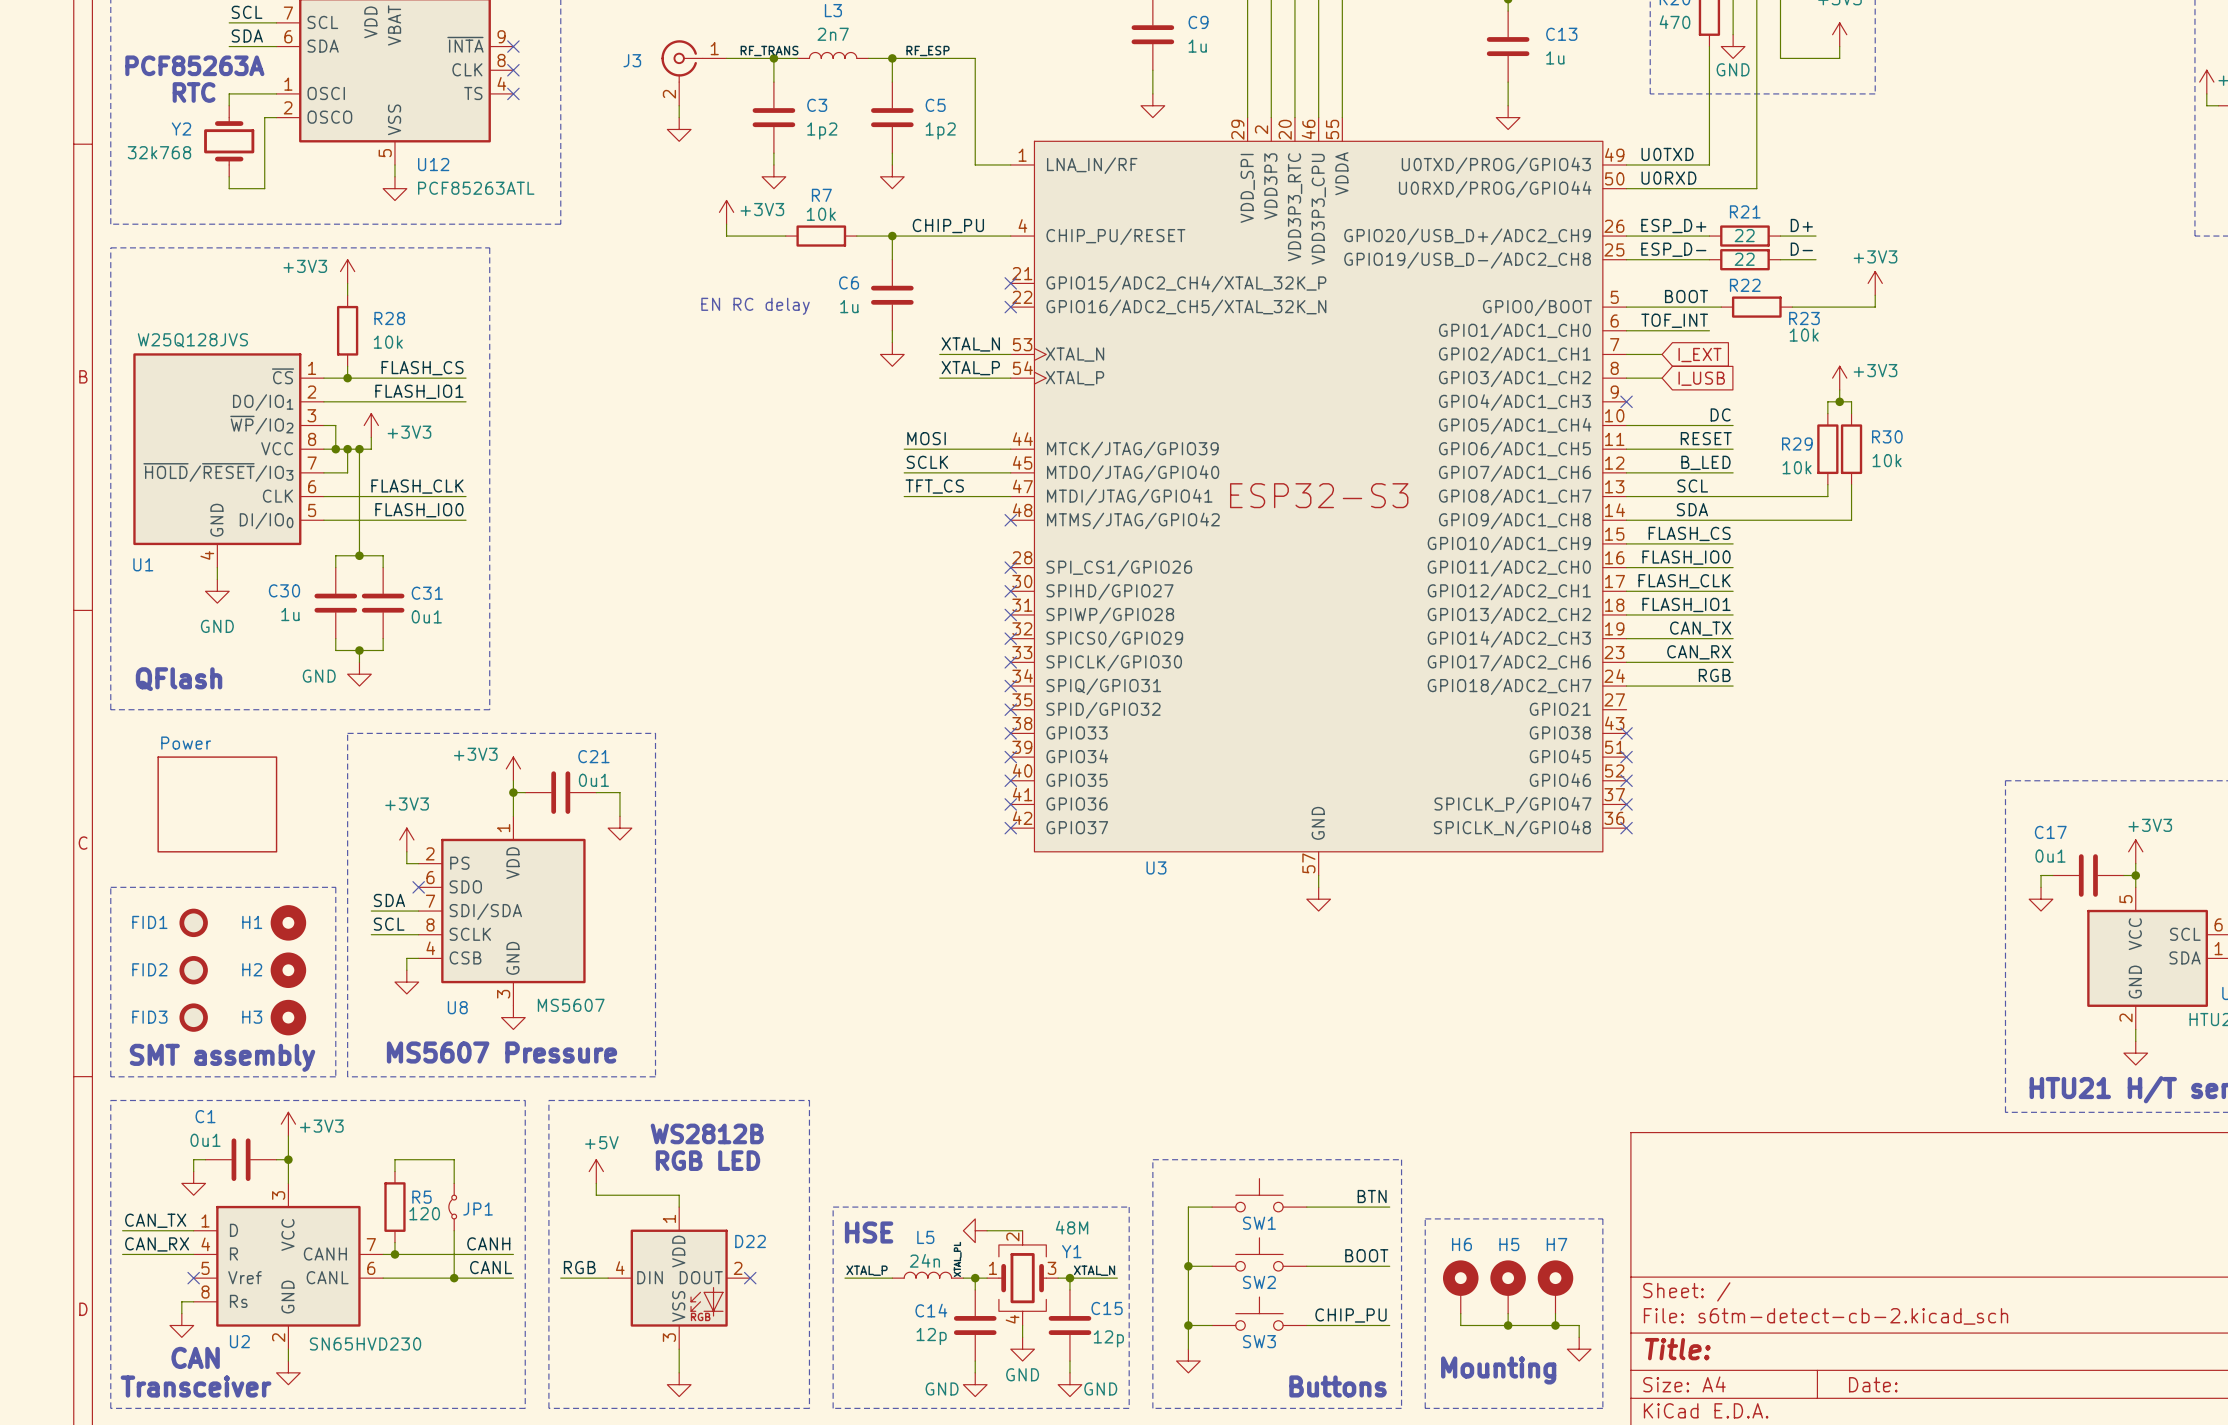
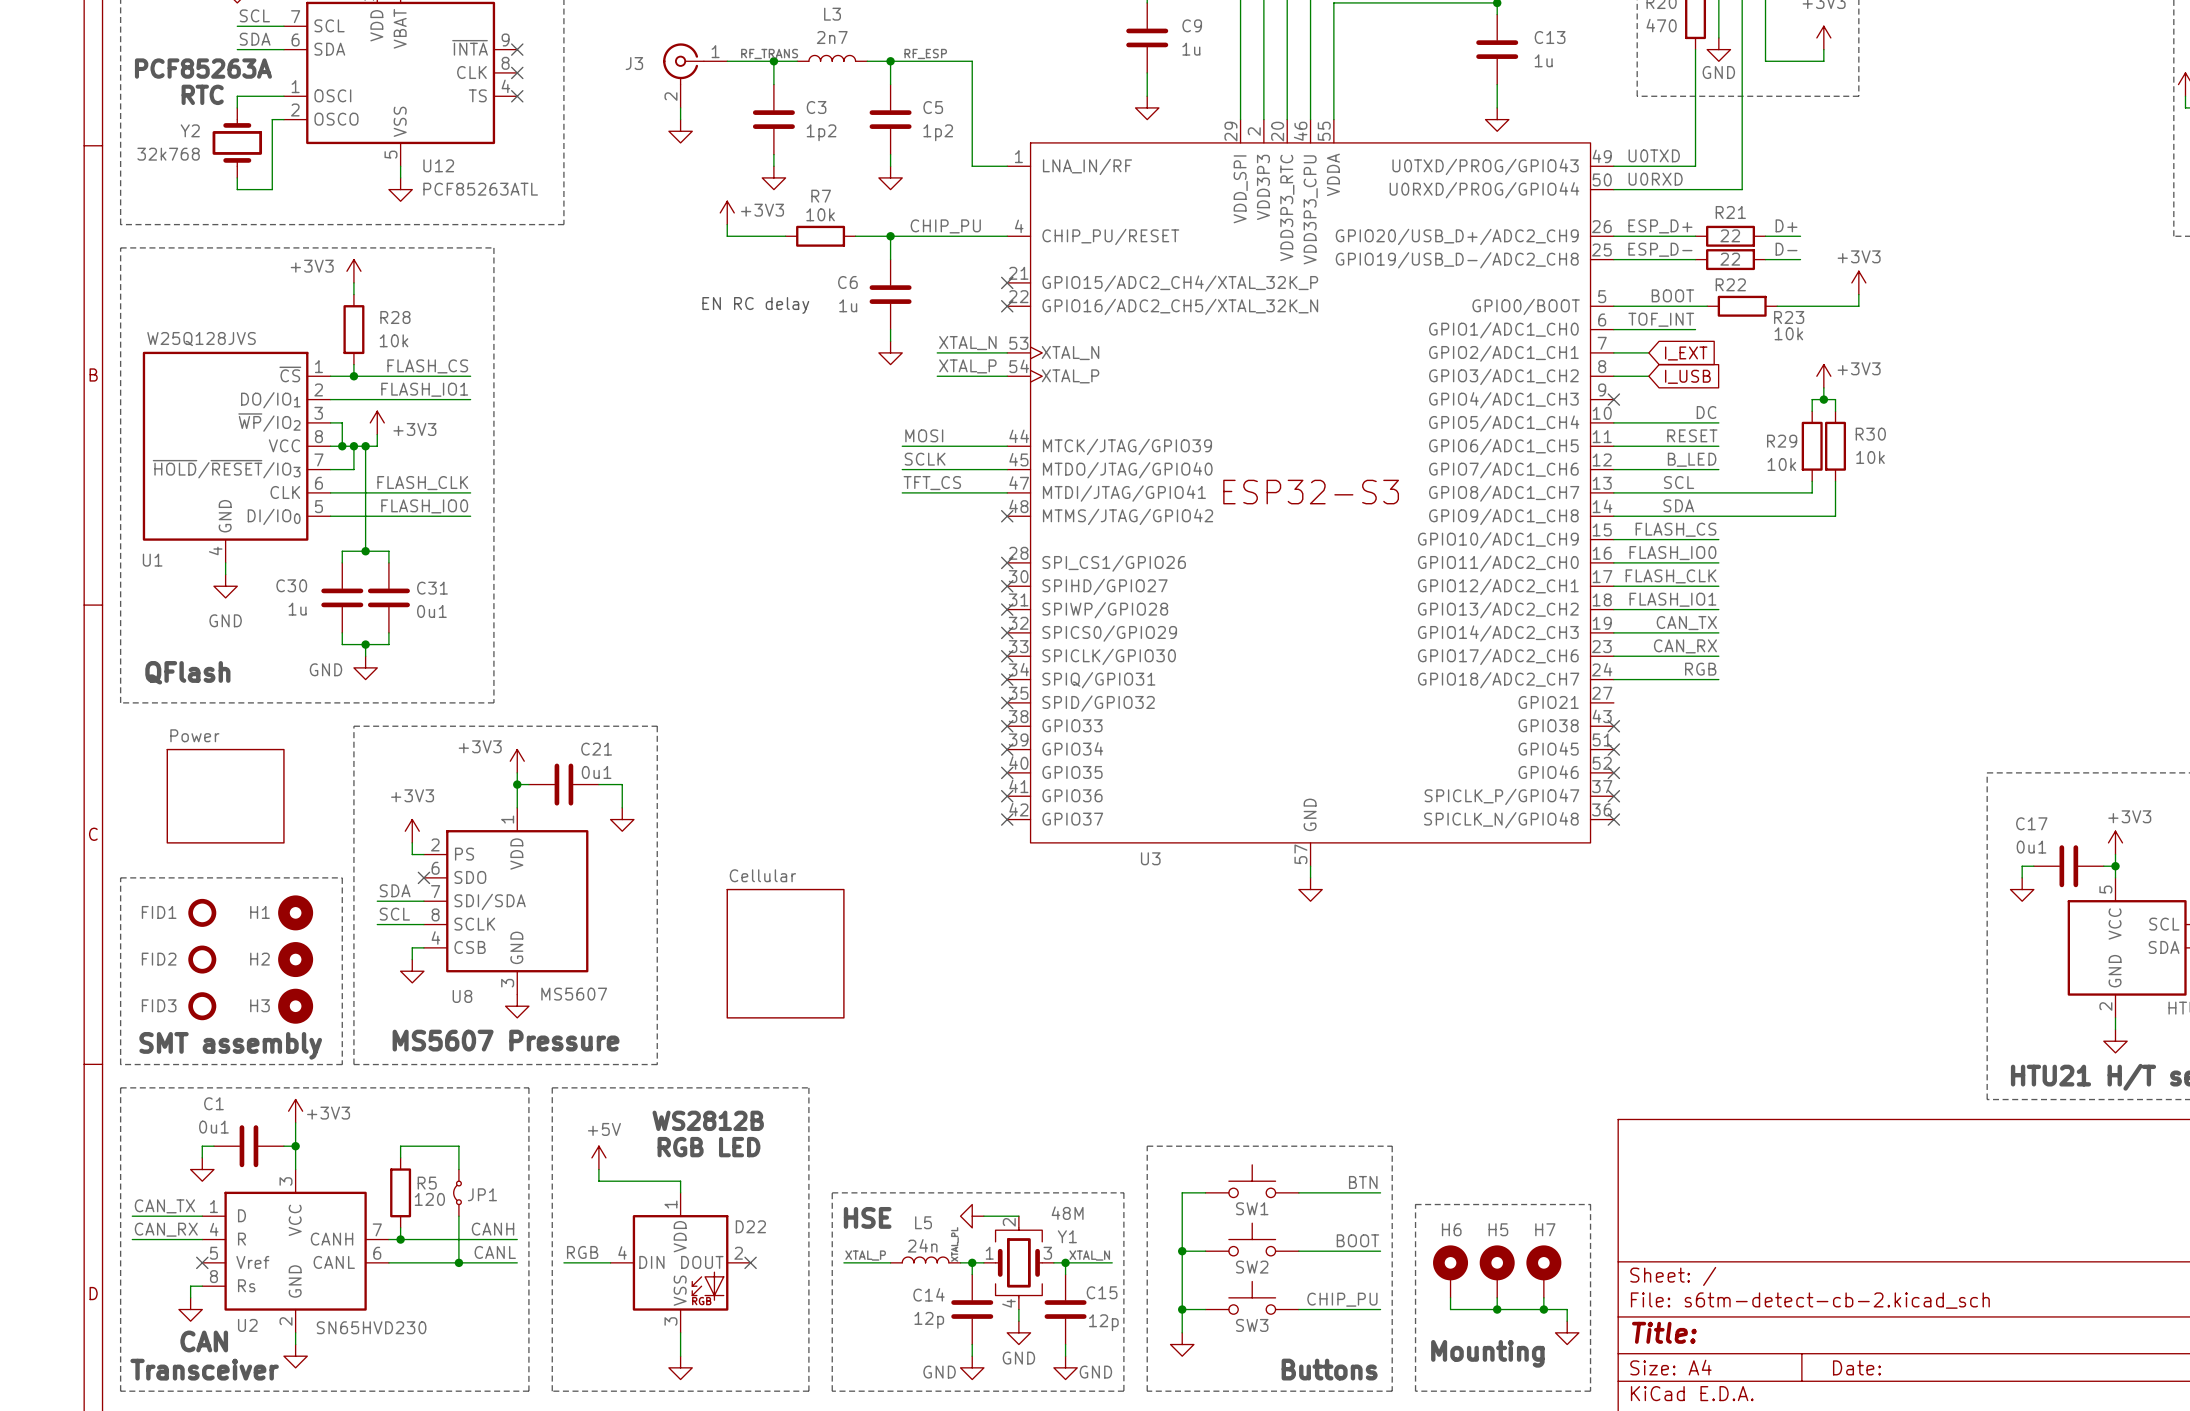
sheet Cellular: none -> (785, 953)

